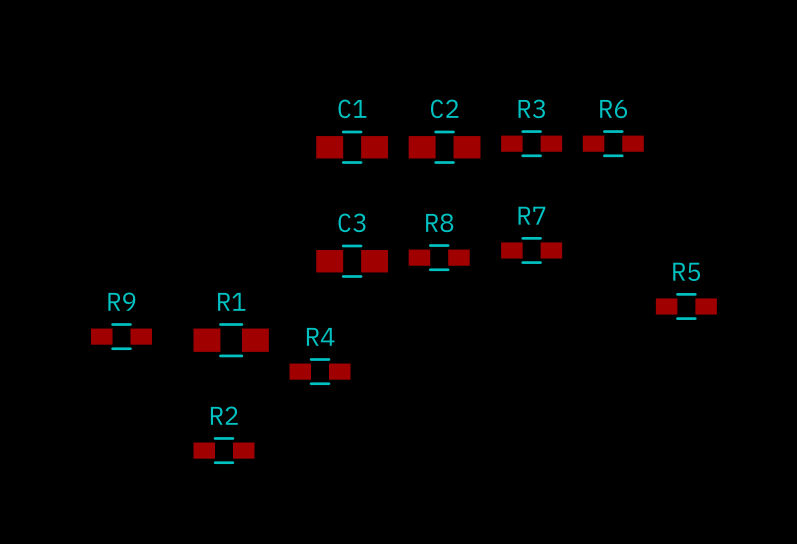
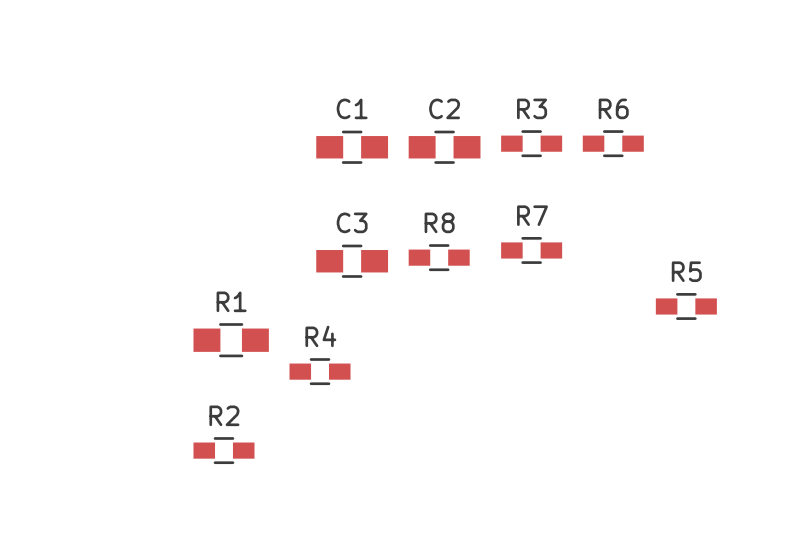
R9: (121, 336) -> none

